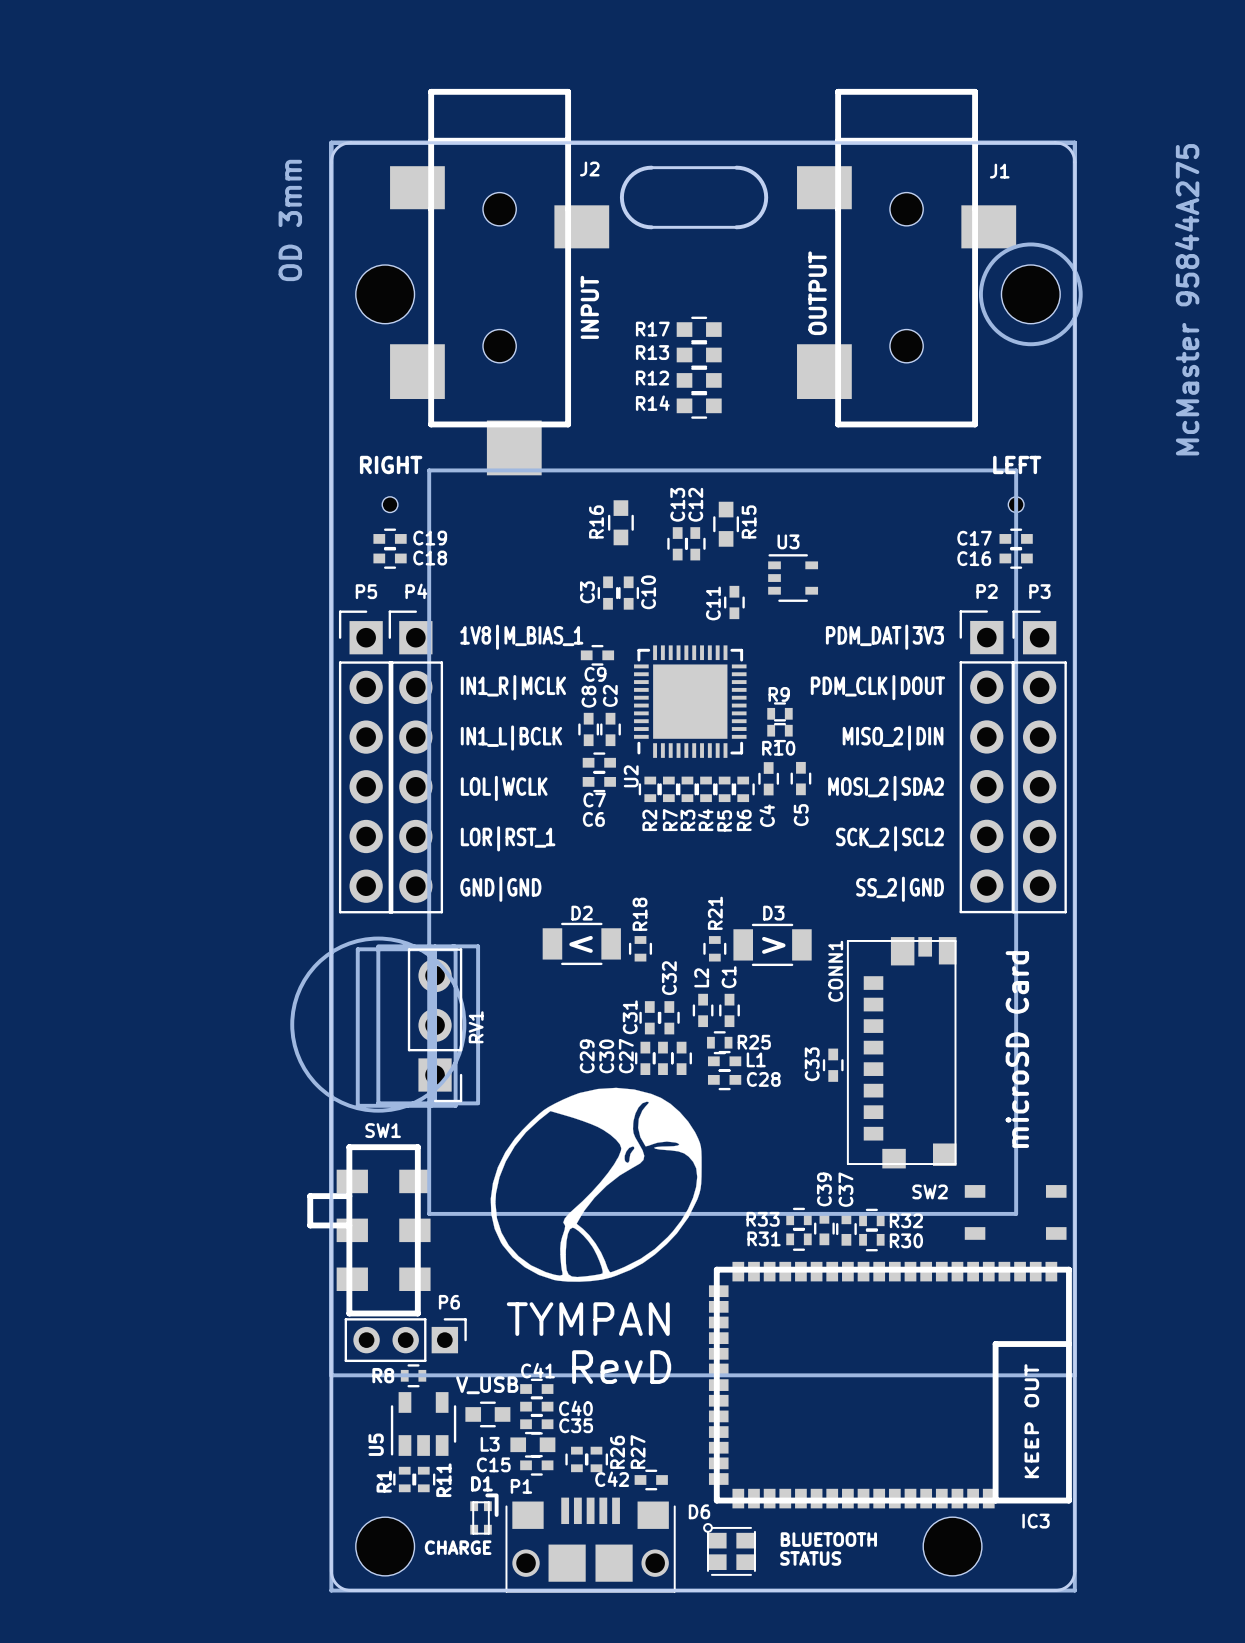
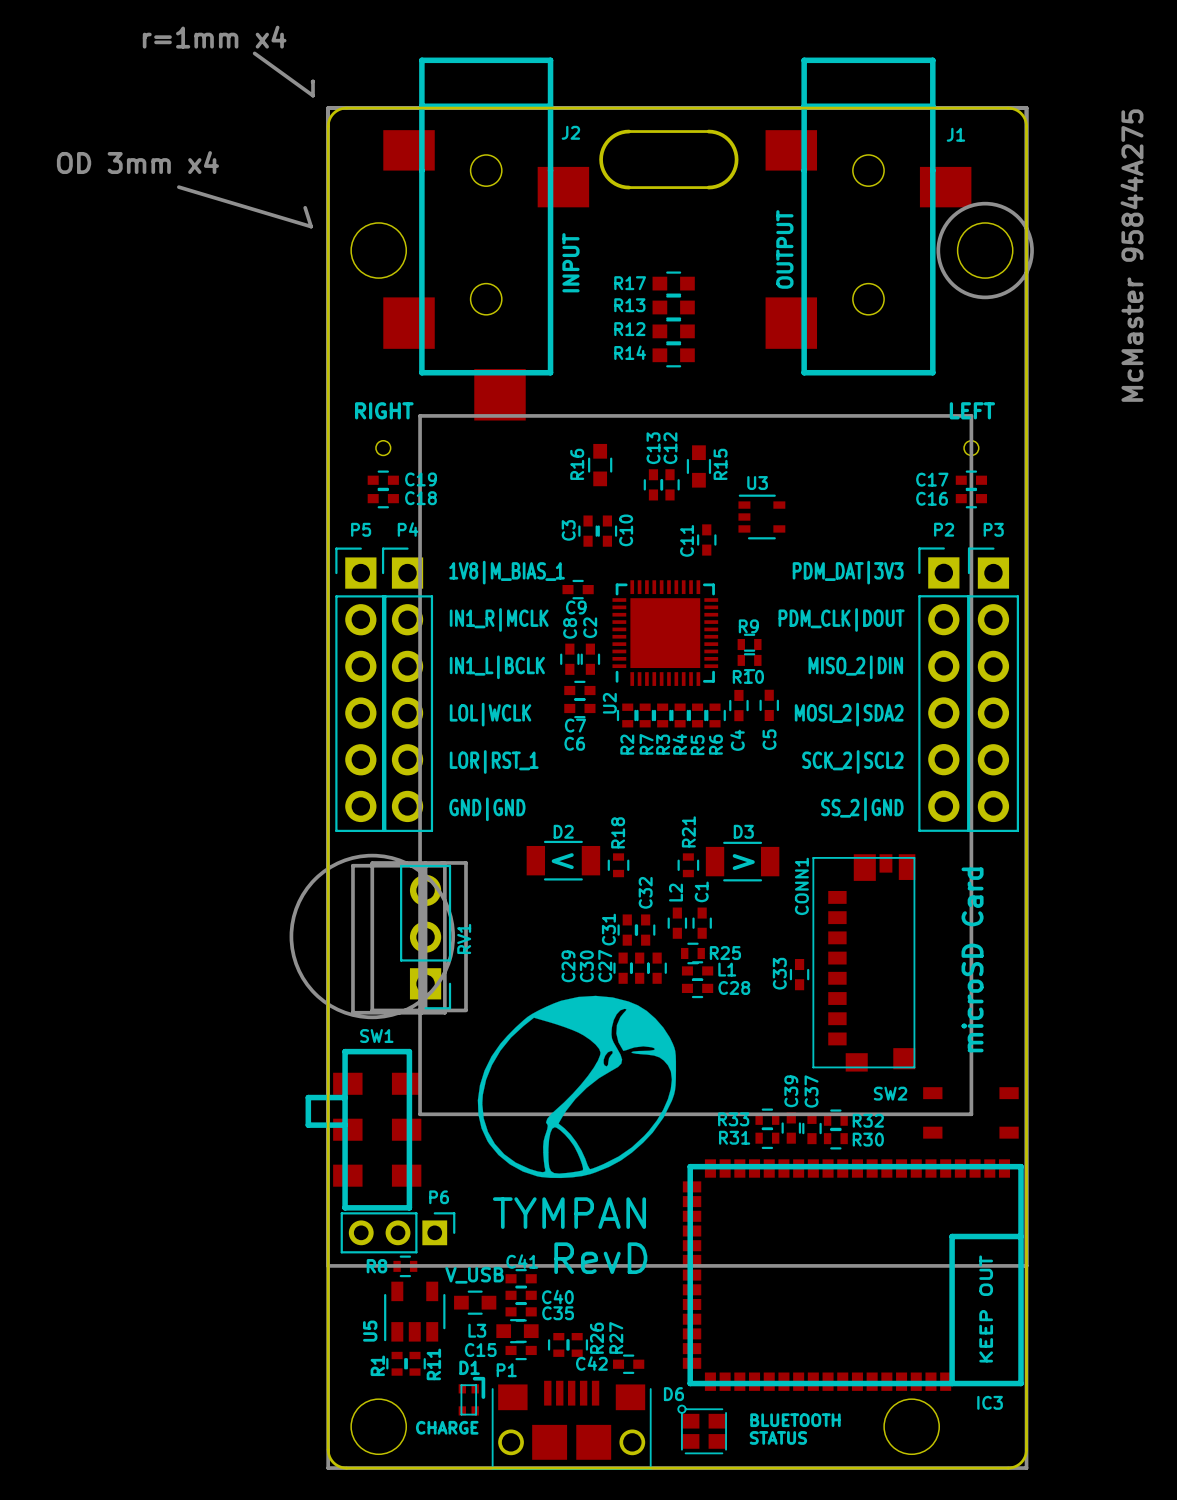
text: none -> r=1mm x4 (214, 37)
line: none -> (254, 53) (313, 95) (312, 81)
text: none -> OD 3mm x4 (137, 162)
text: OD 3mm (290, 220) -> none
line: none -> (178, 187) (311, 226) (305, 207)

